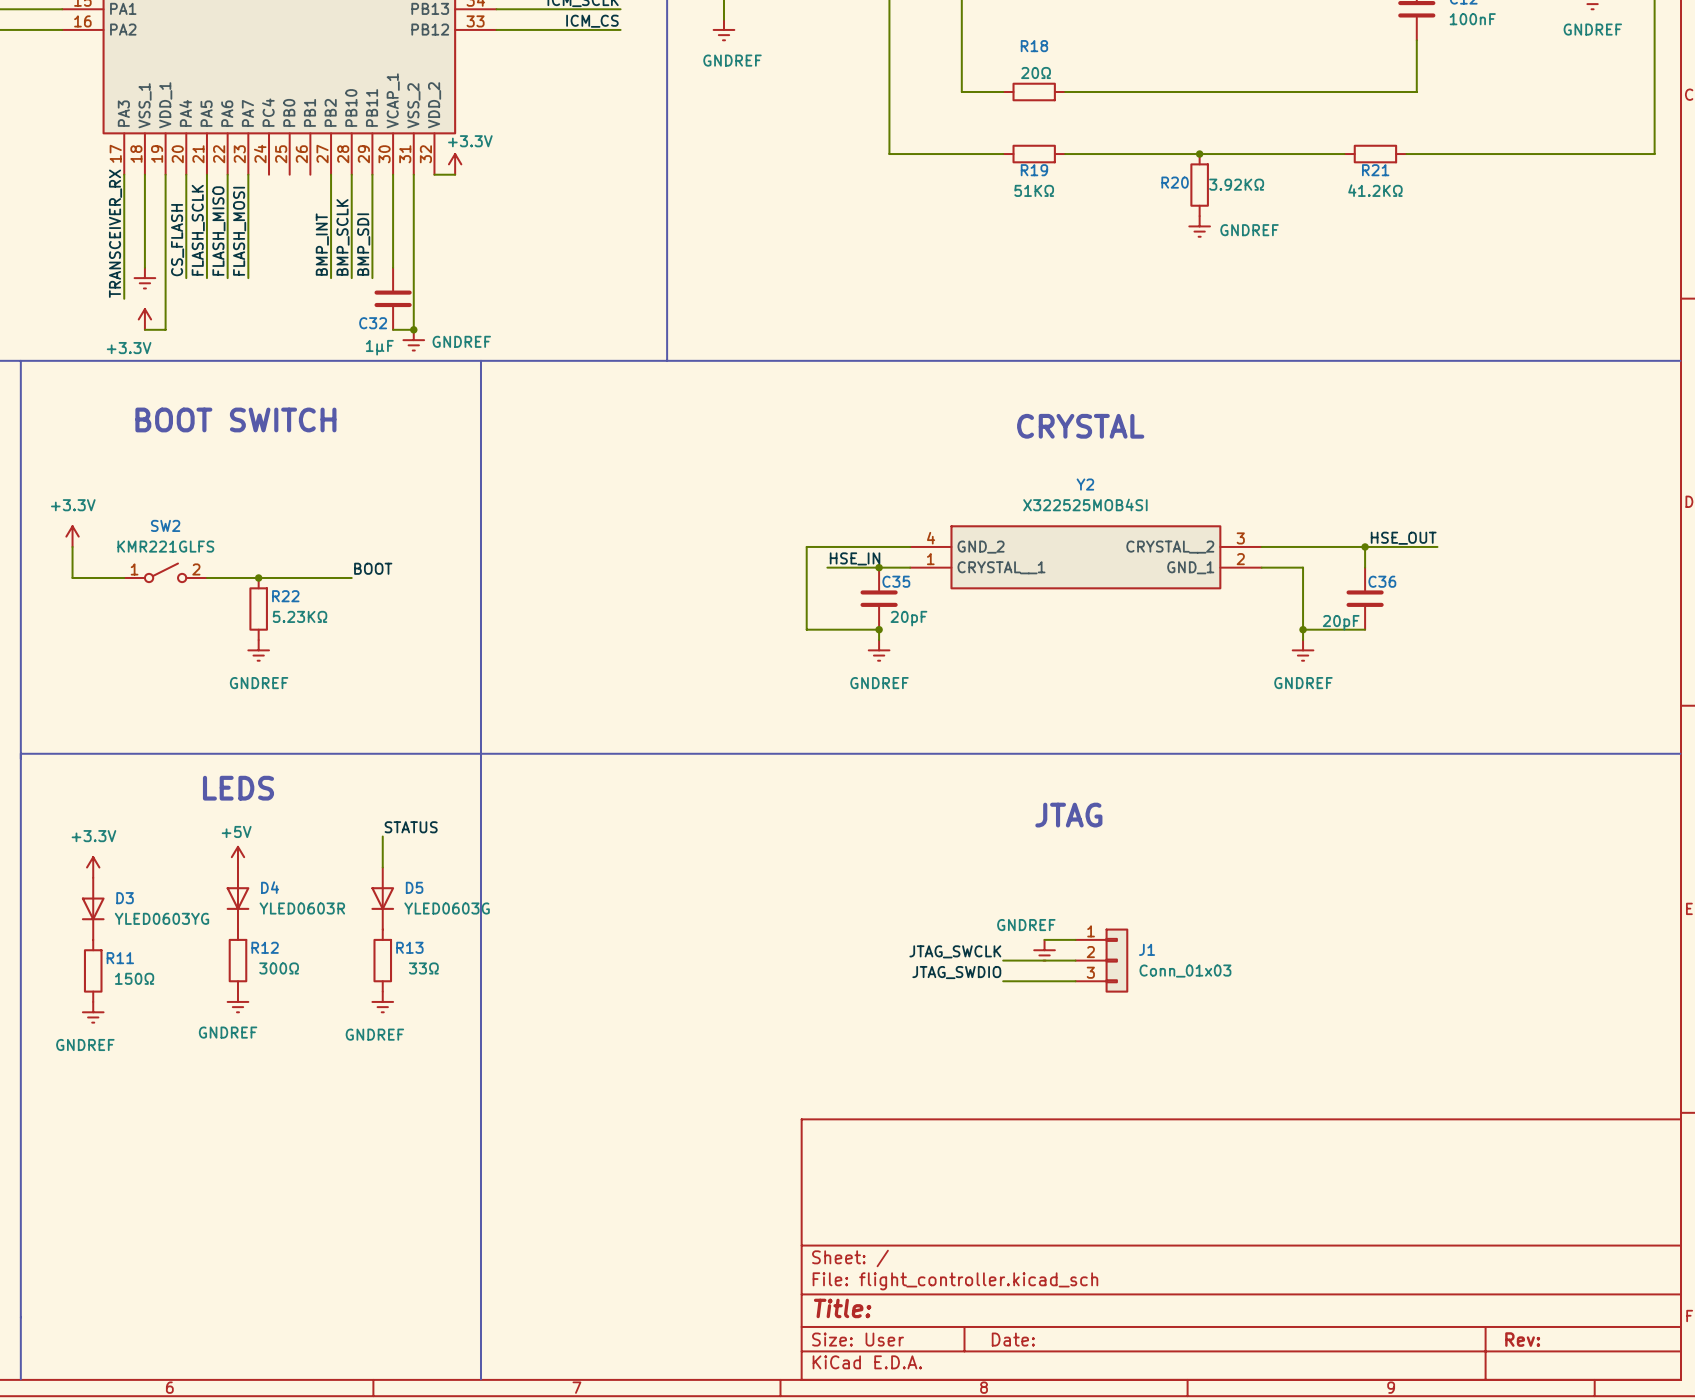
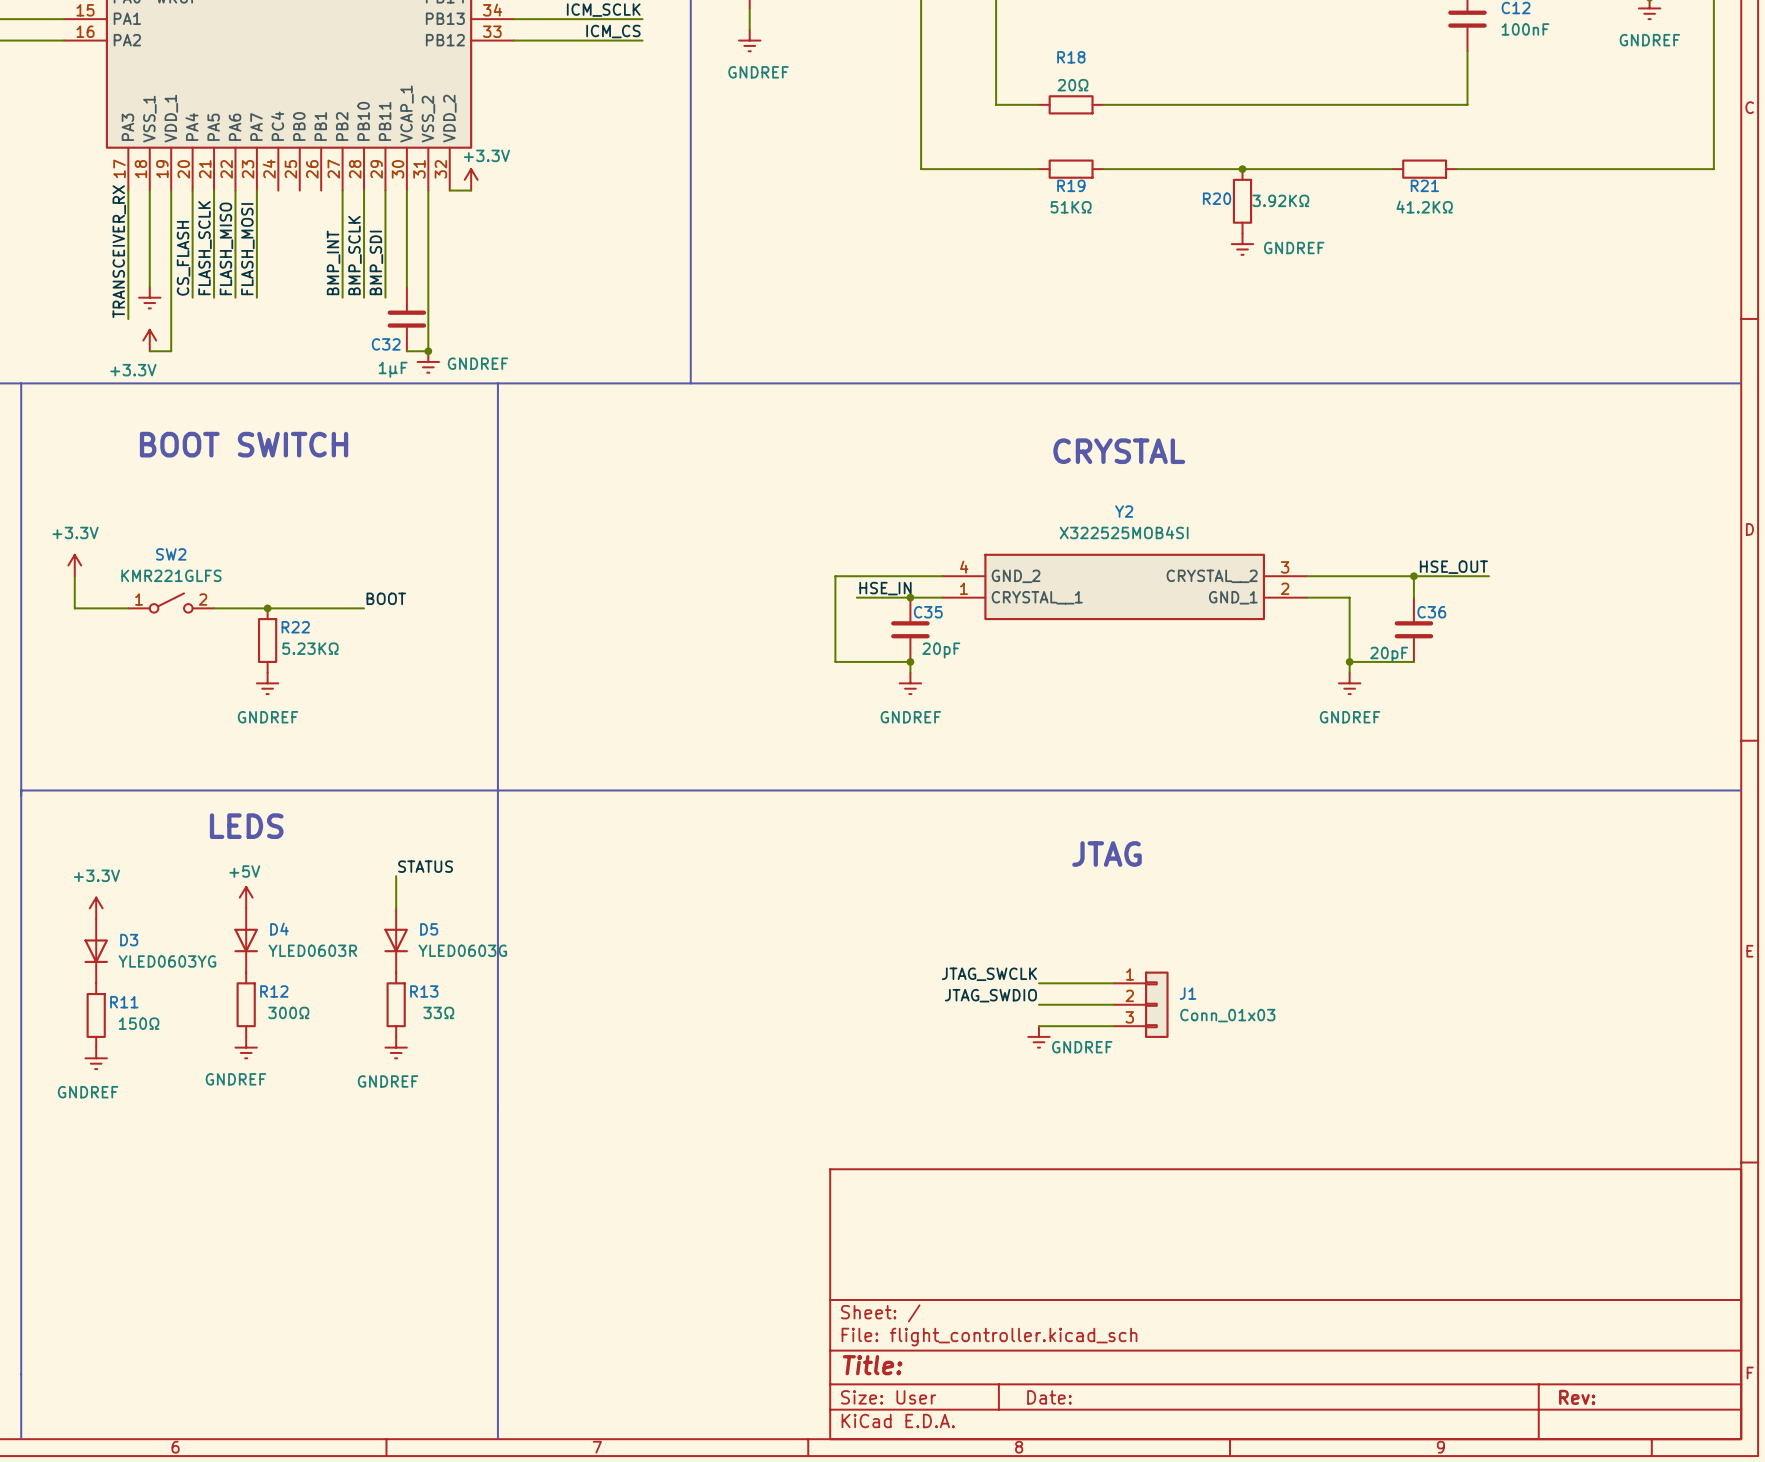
power symbol text position: GNDREF (1026, 925) -> GNDREF (1082, 1047)
label: none -> JTAG_SWCLK (989, 974)
wire: none -> (1038, 983) (1081, 983)
power symbol position: GNDREF (1044, 950) -> GNDREF (1038, 1036)
label: JTAG_SWCLK (955, 951) -> JTAG_SWDIO (990, 995)
label: JTAG_SWDIO (956, 972) -> none

